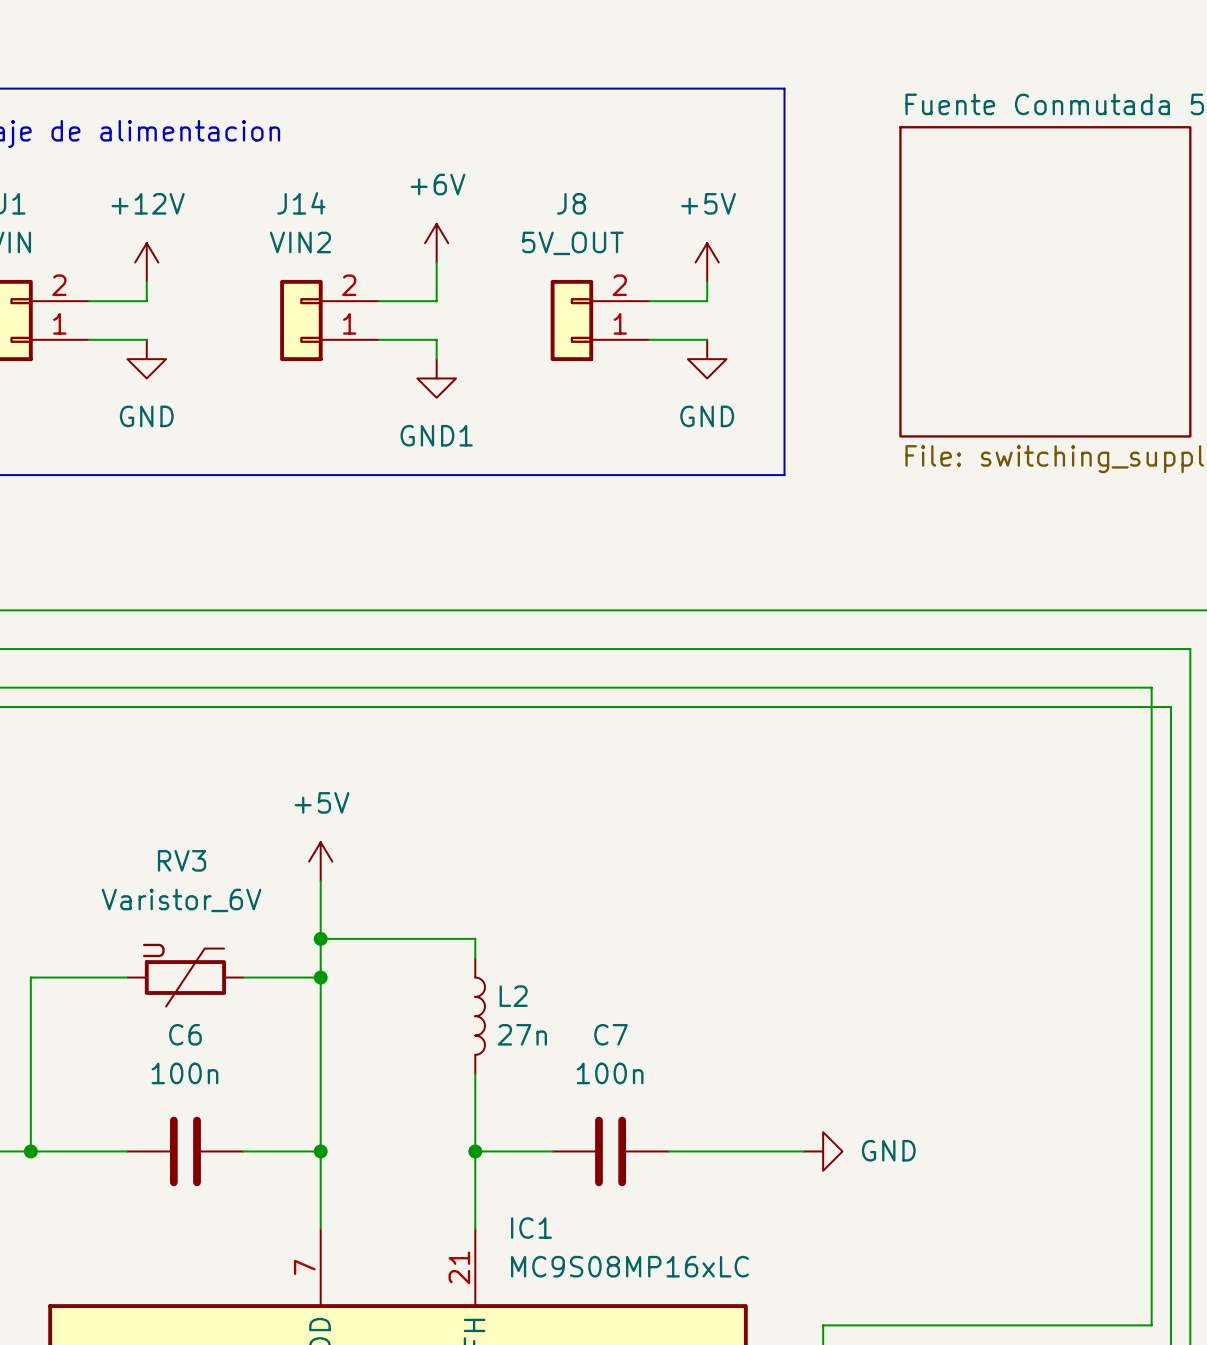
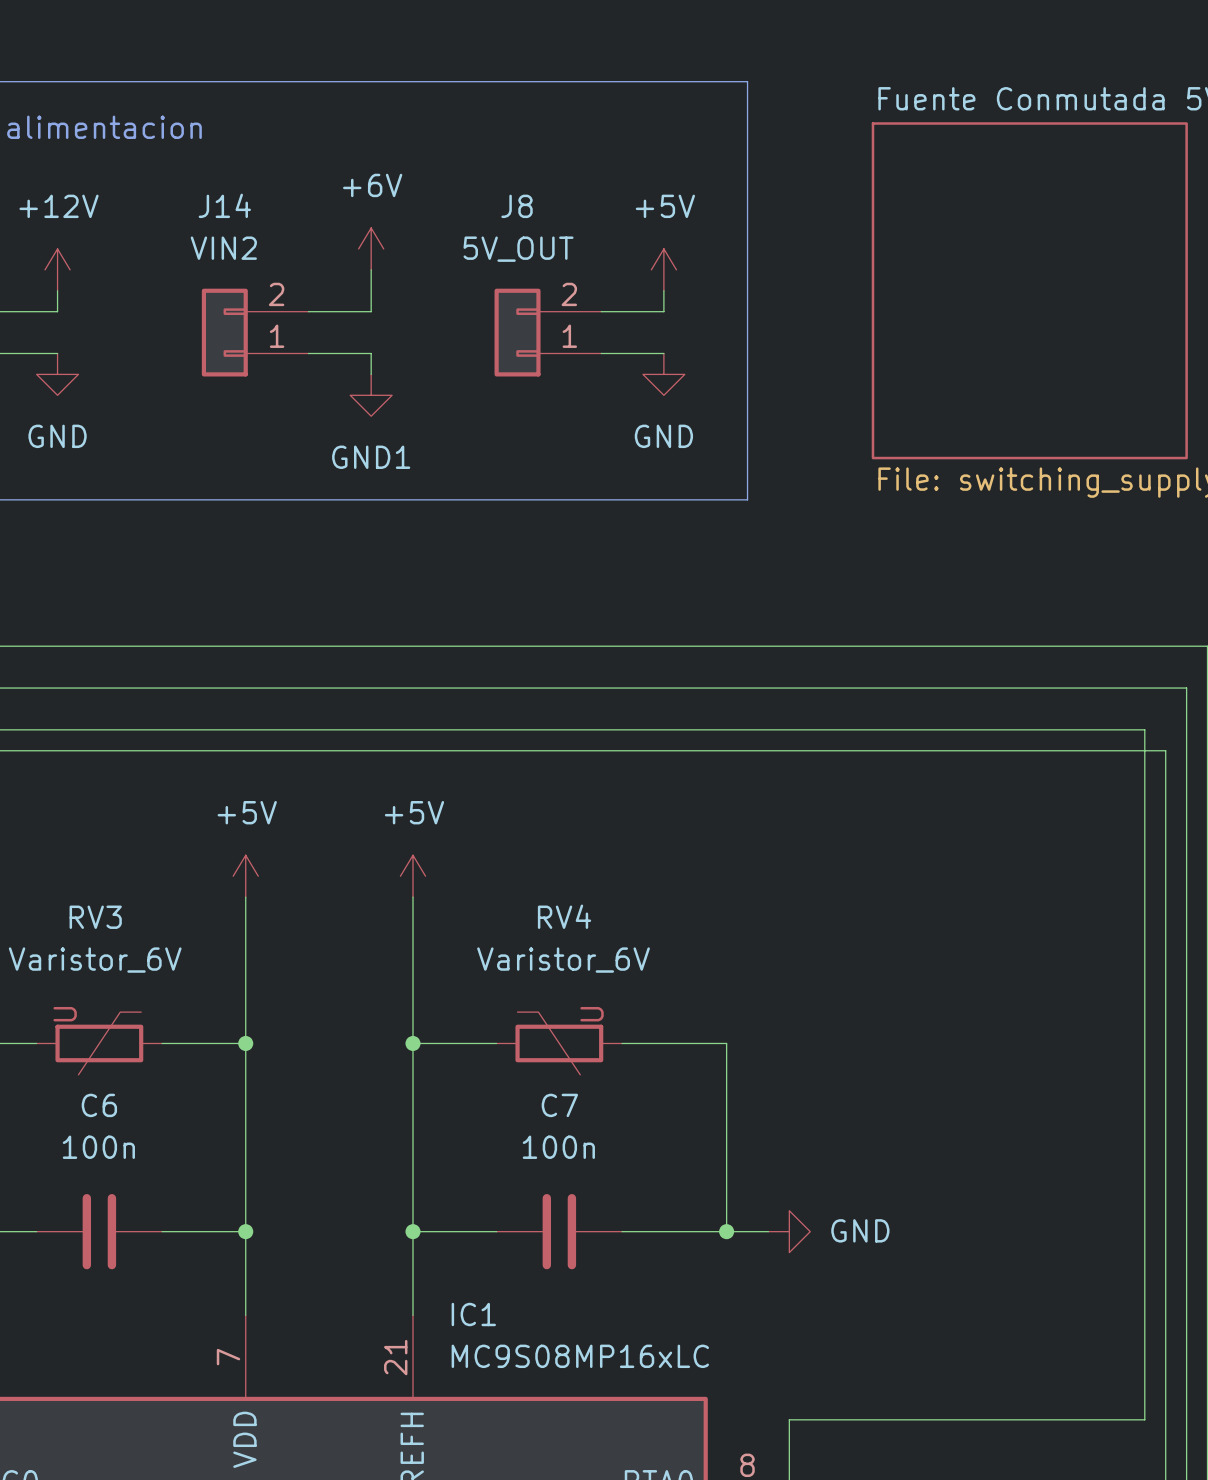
power symbol: none -> +5V (412, 876)
power symbol position: +5V (320, 861) -> +5V (245, 876)
wire: (320, 938) (475, 938) -> (412, 897) (412, 1001)
junction: (320, 938) -> none
wire: none -> (412, 1022) (412, 1148)
wire: none -> (412, 1043) (496, 1043)
junction: none -> (412, 1043)
RV4: none -> Varistor_6V (559, 1043)
wire: none -> (622, 1043) (726, 1043) (726, 1231)
L2: 27n (480, 1016) -> none
junction: none -> (726, 1231)

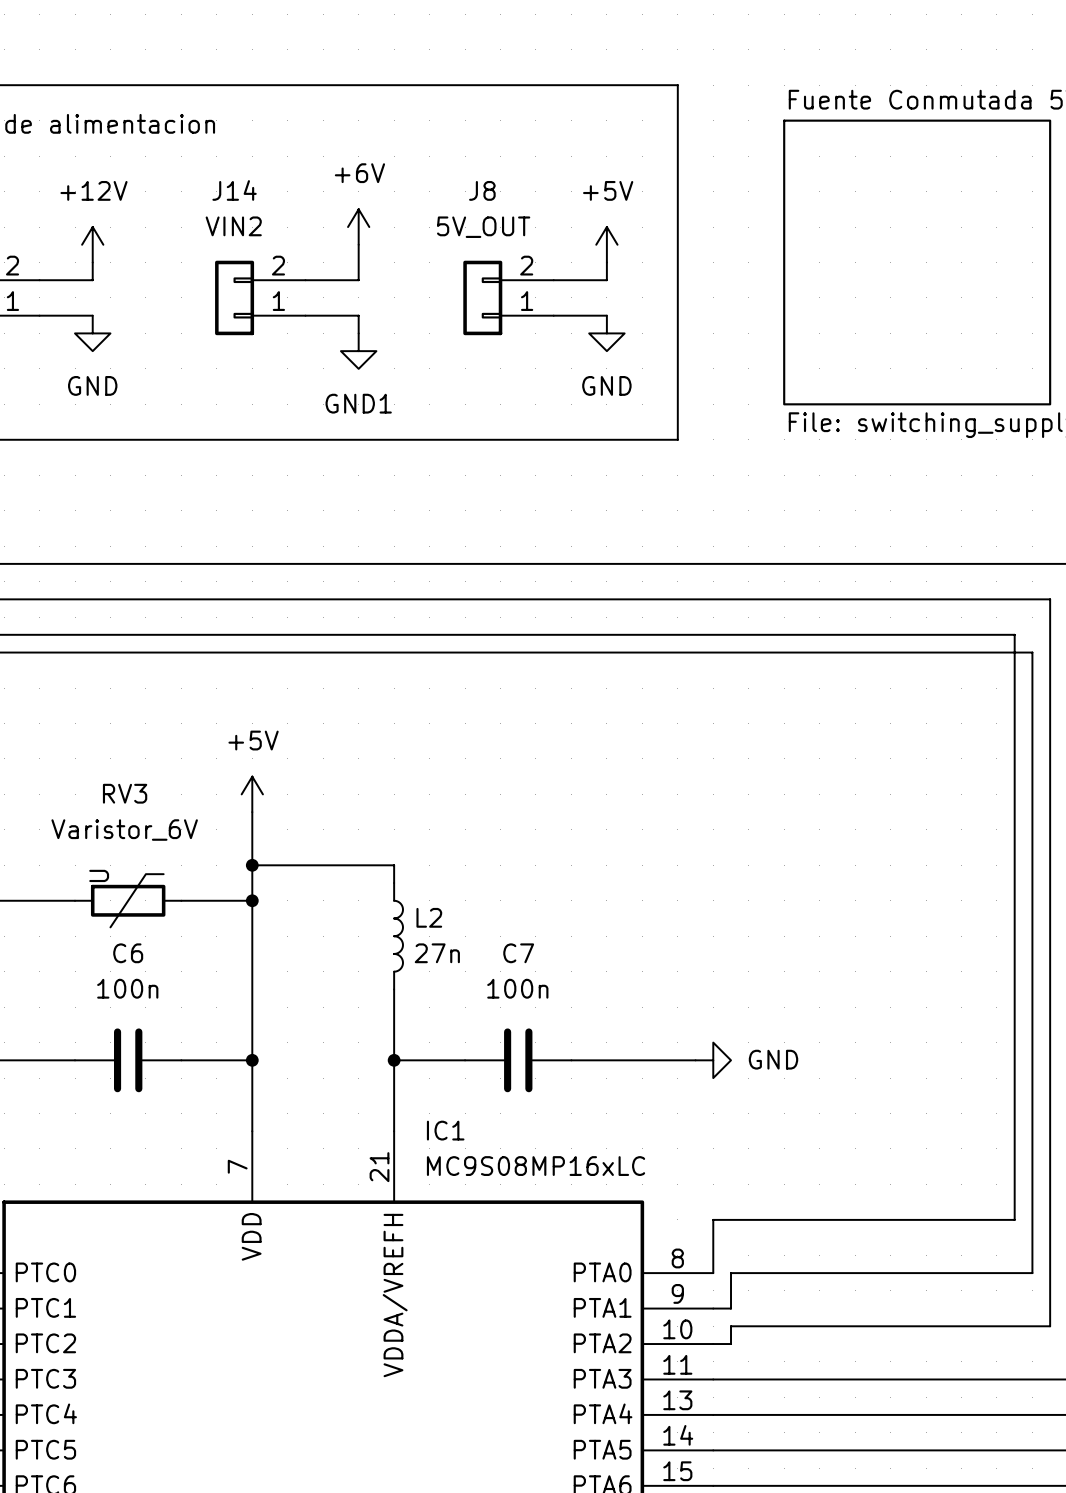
power symbol position: +5V (245, 876) -> +5V (252, 794)
power symbol: +5V (412, 876) -> none
wire: (412, 897) (412, 1001) -> (252, 865) (394, 865)
junction: none -> (252, 865)
wire: (412, 1022) (412, 1148) -> none
wire: (412, 1043) (496, 1043) -> none
junction: (412, 1043) -> none
RV4: Varistor_6V (559, 1043) -> none
wire: (622, 1043) (726, 1043) (726, 1231) -> none
L2: none -> 27n (398, 936)
junction: (726, 1231) -> none

